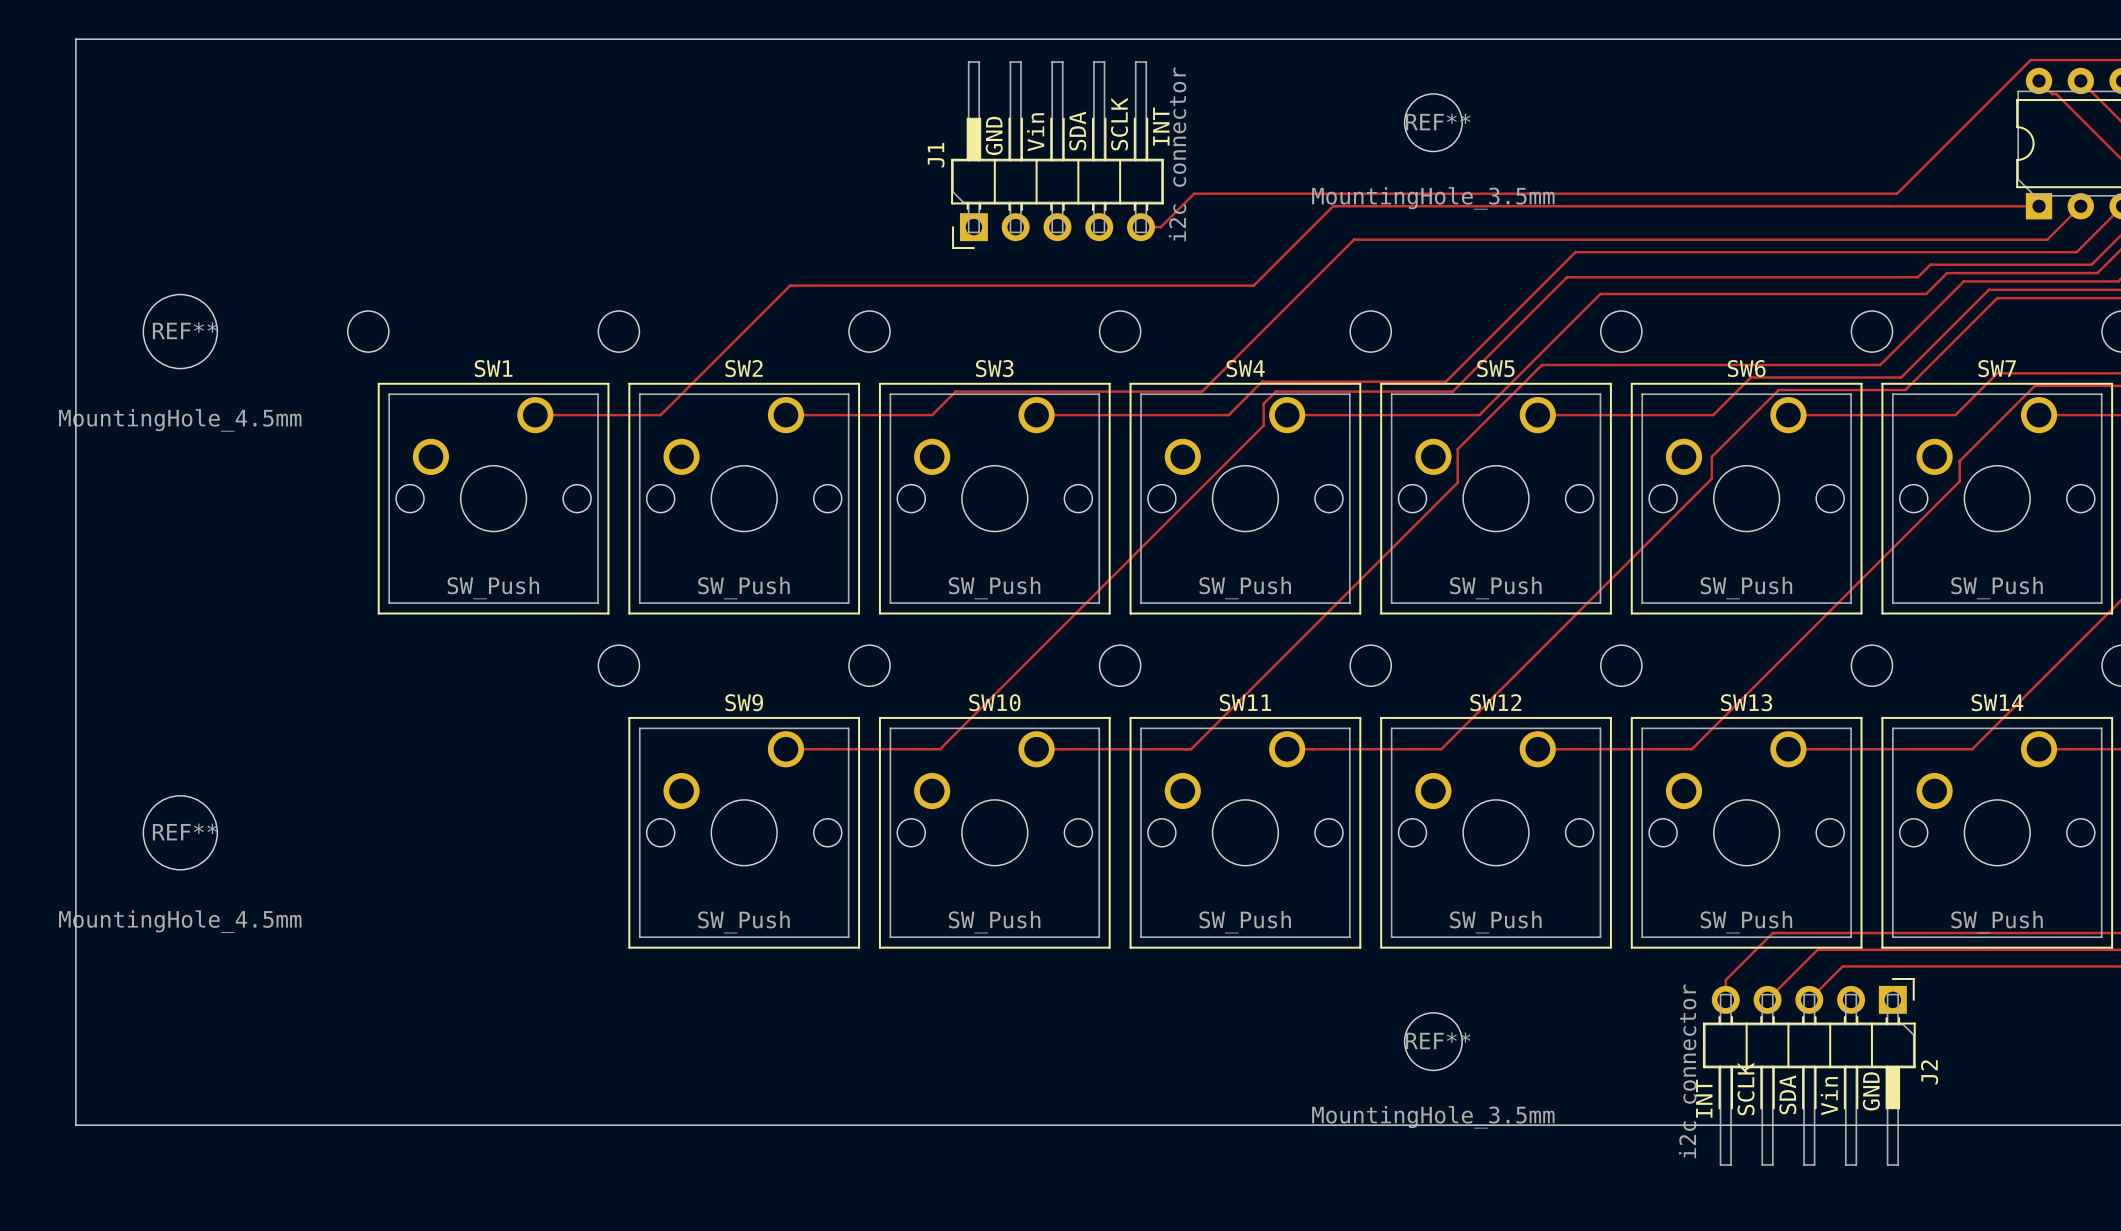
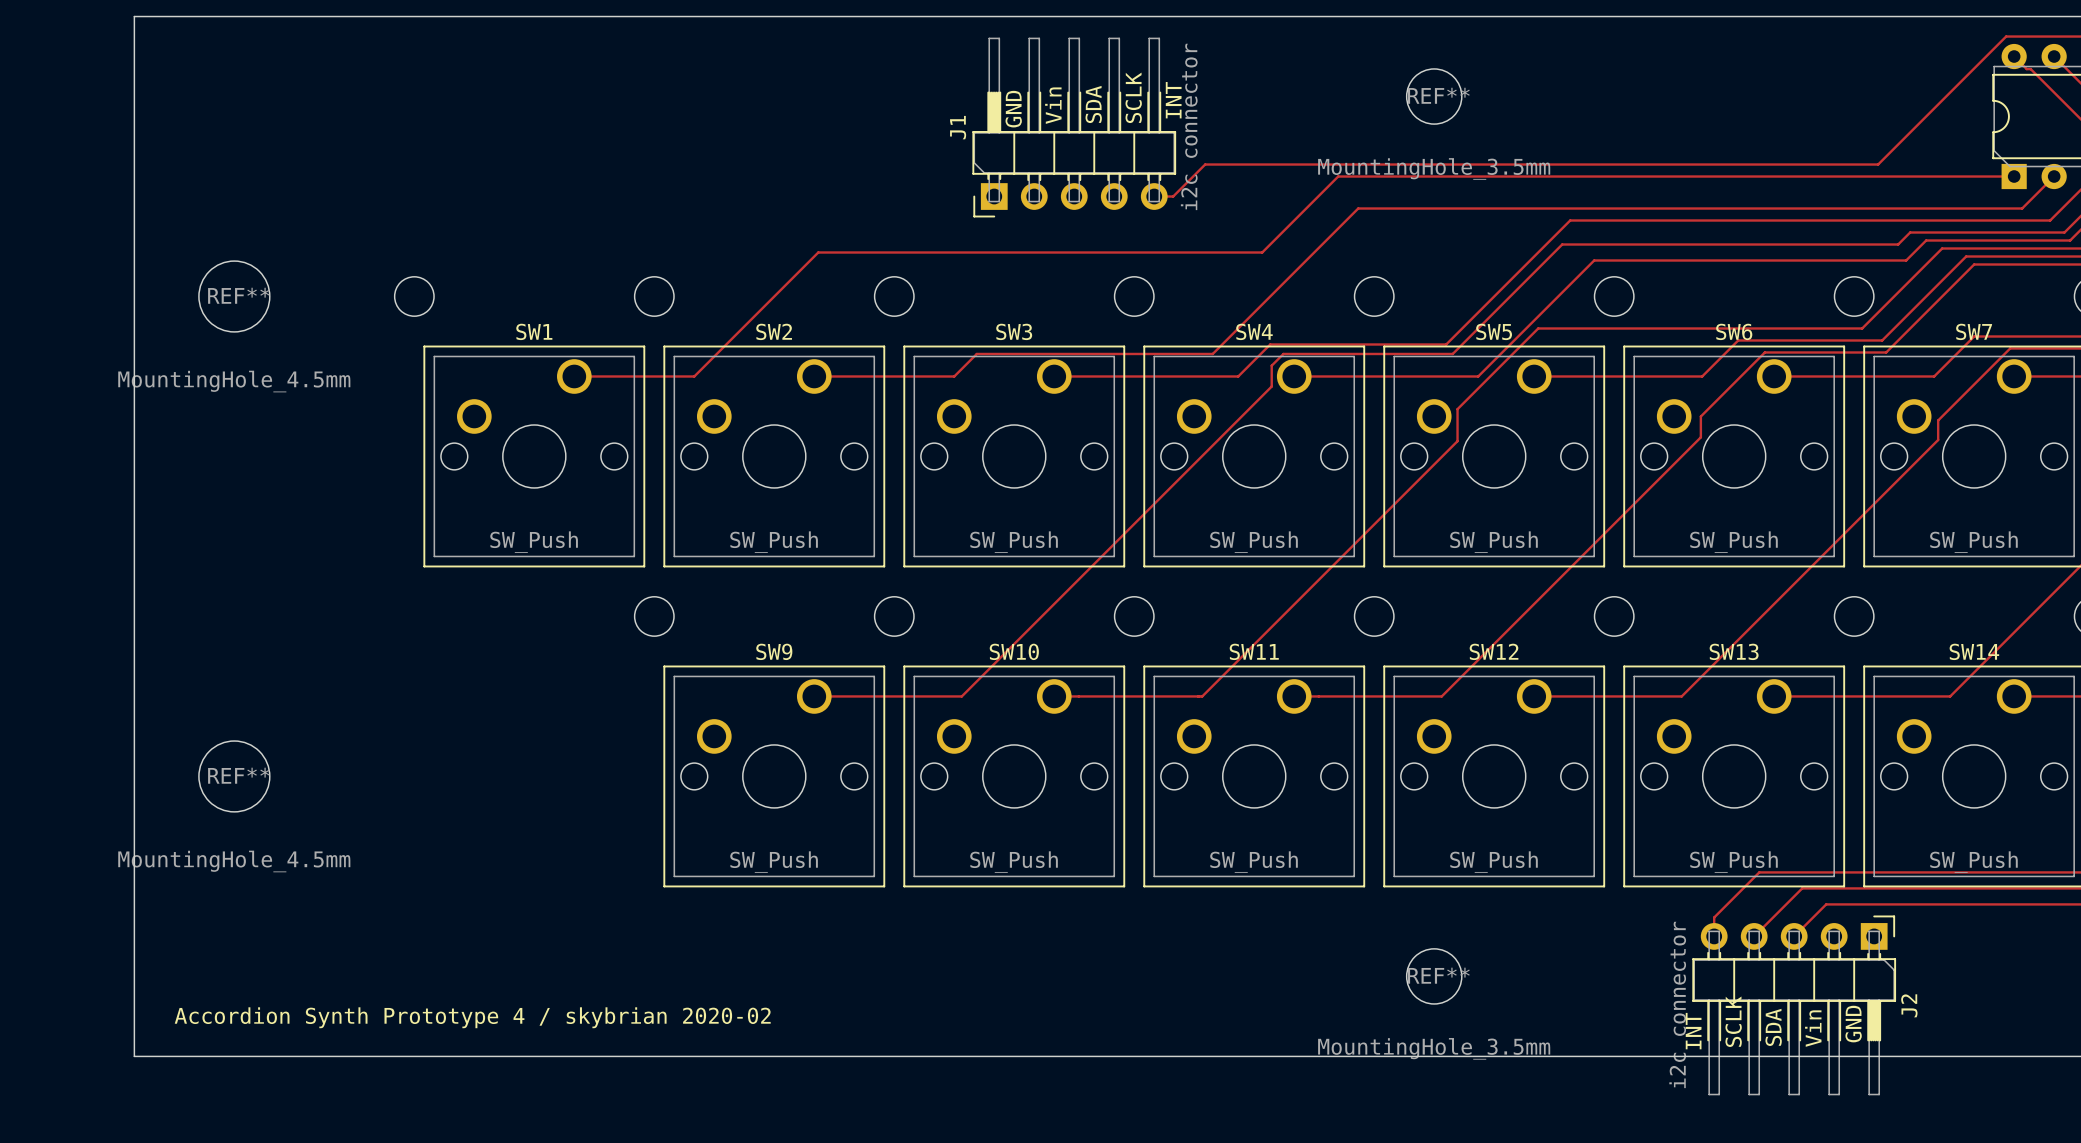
text: none -> Accordion Synth Prototype 4 / skybrian 2020-02 (472, 1017)

